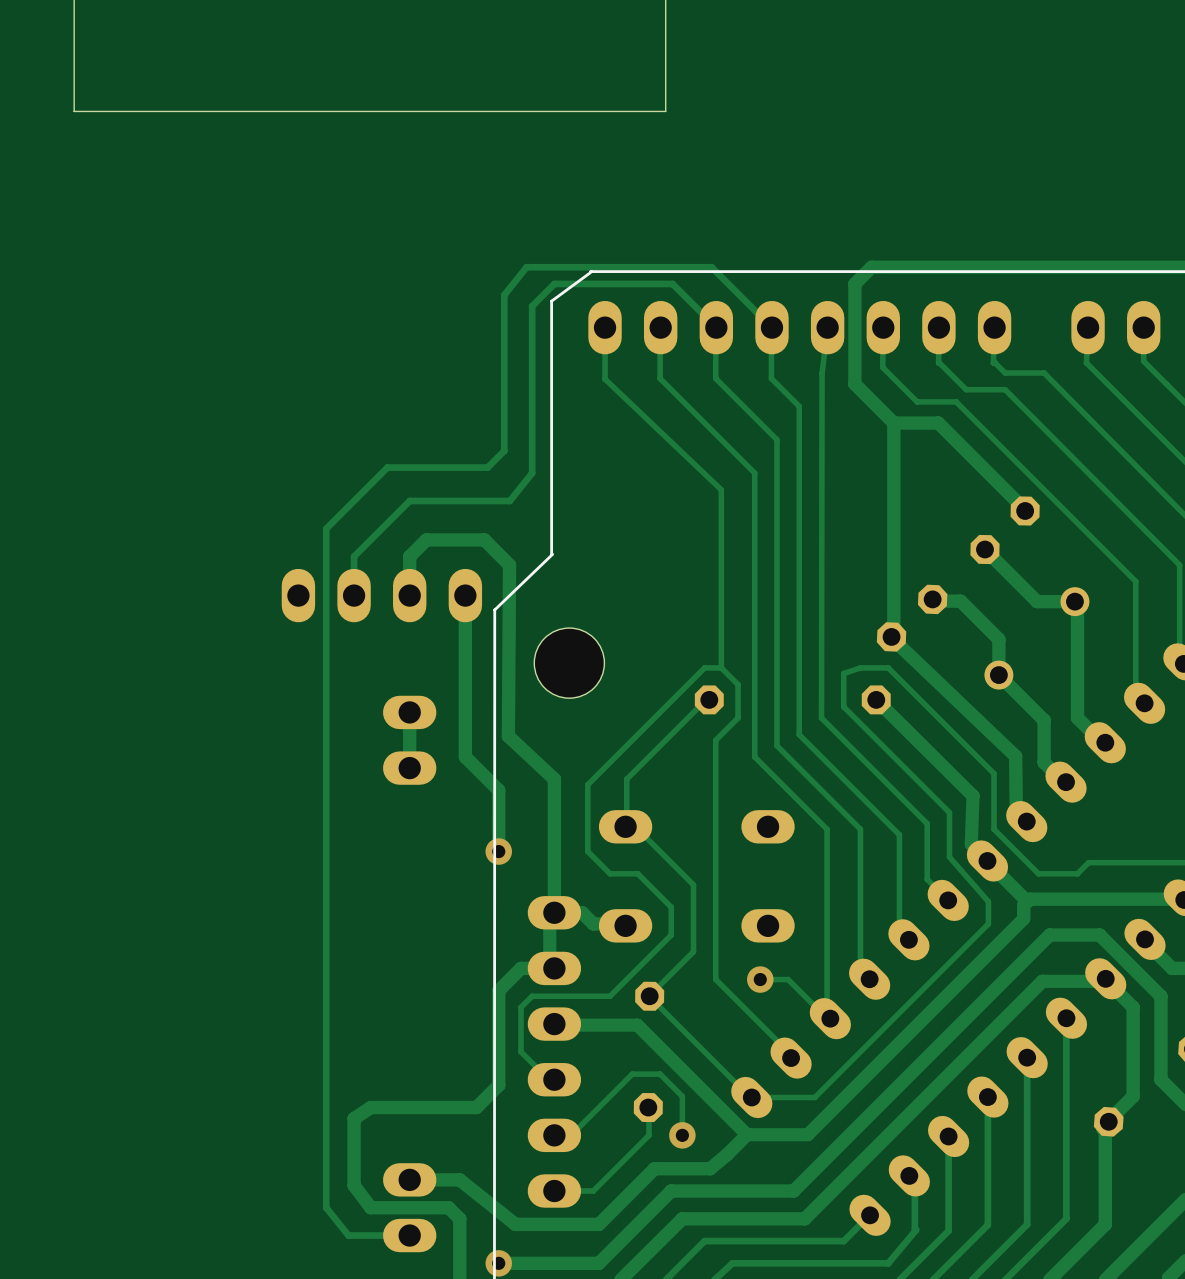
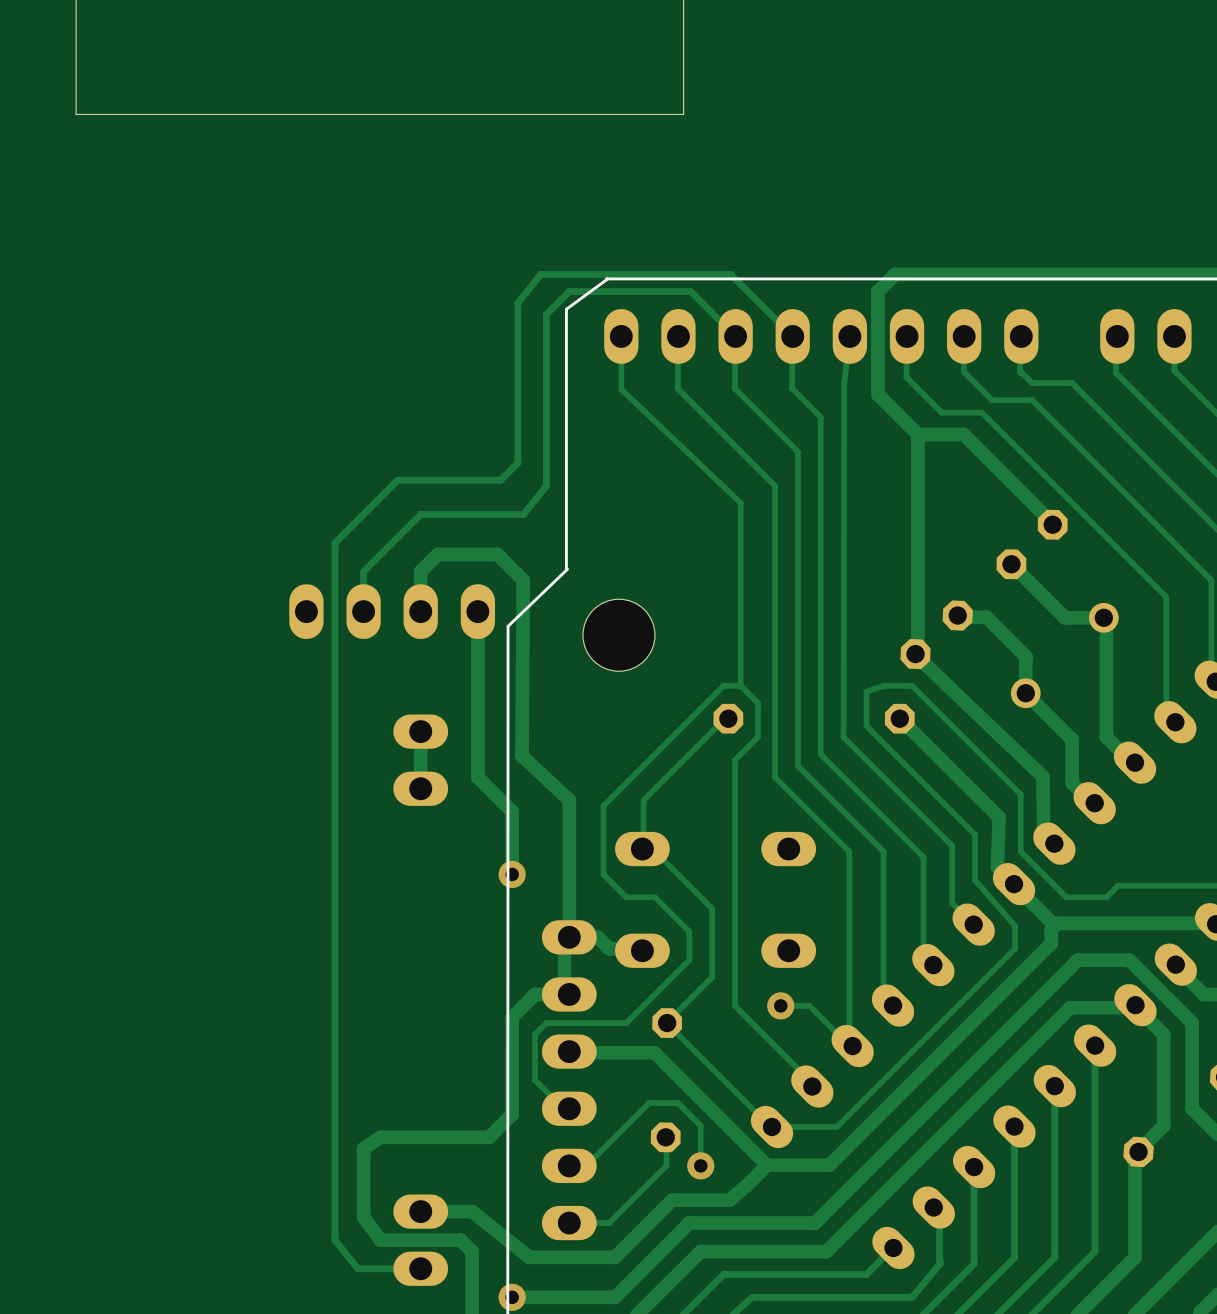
hole position: (569, 663) -> (618, 635)

